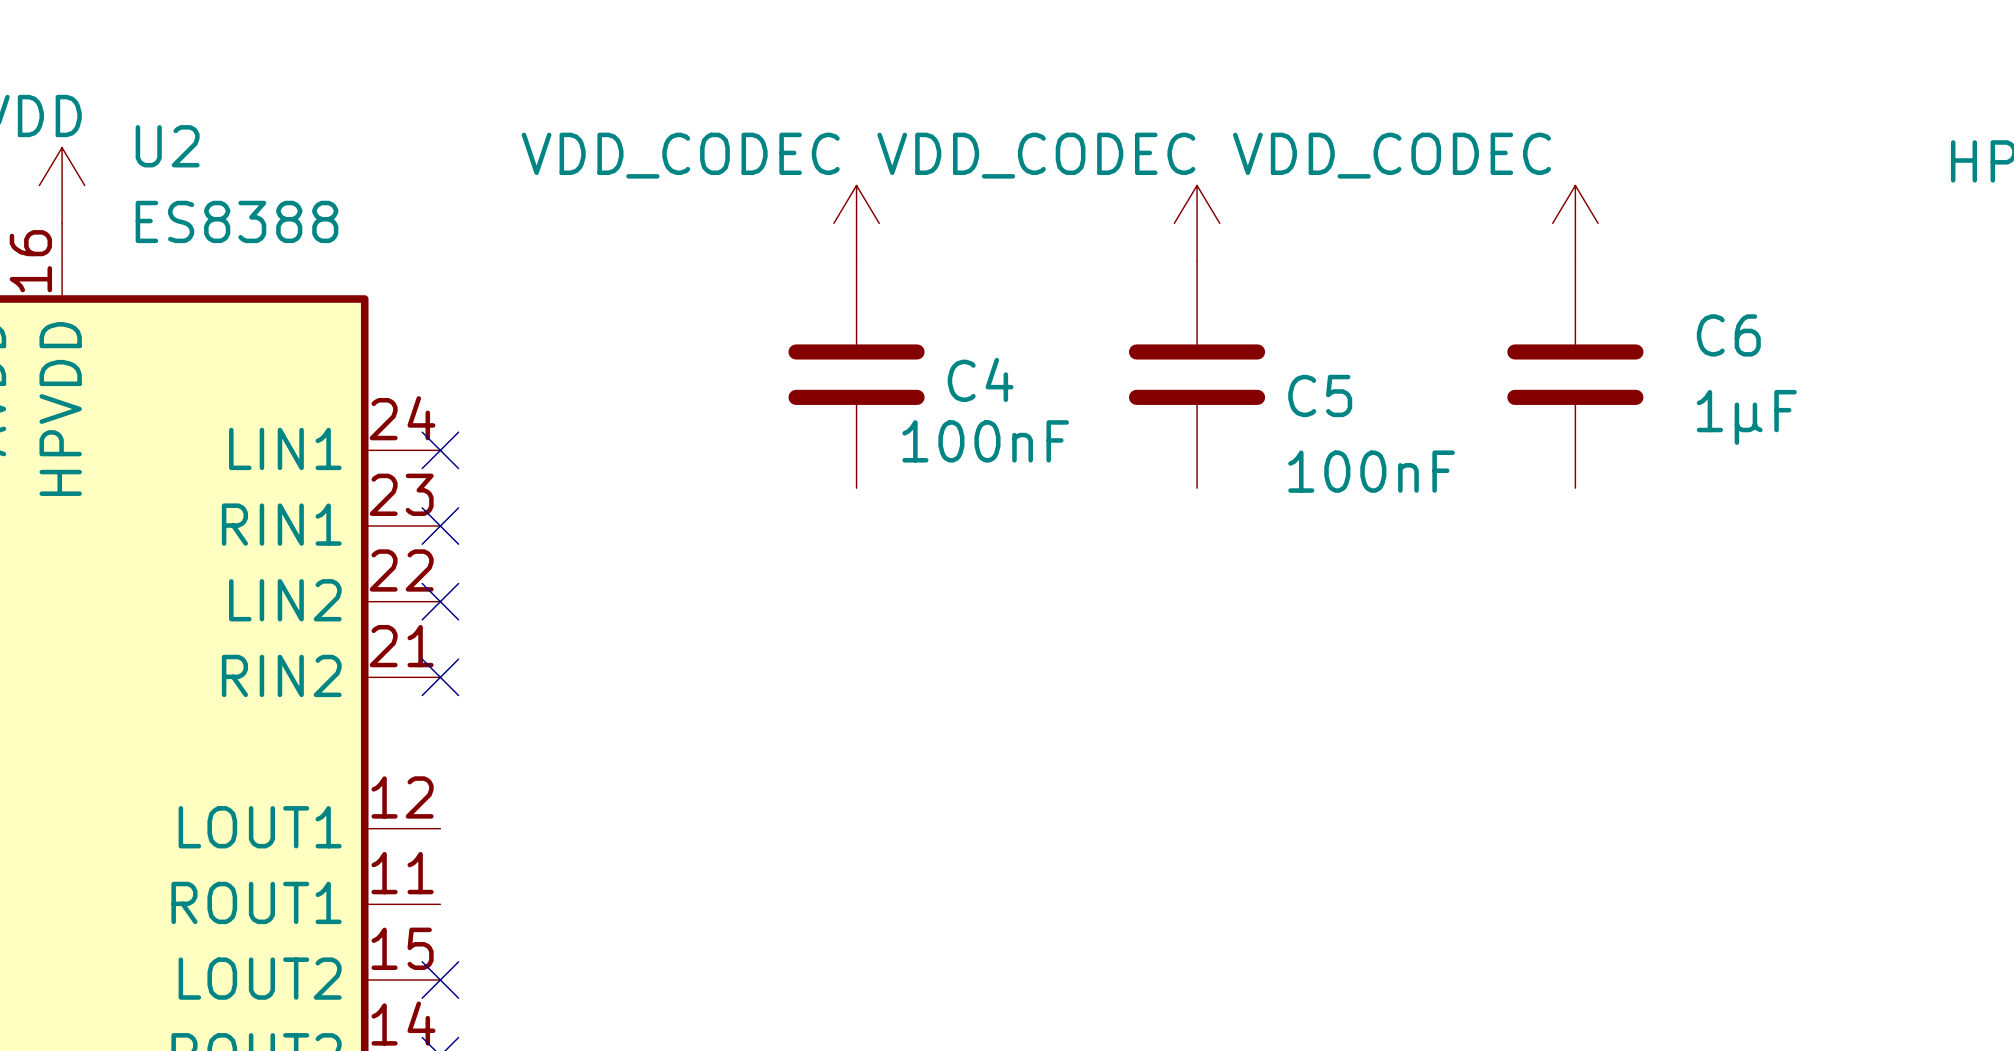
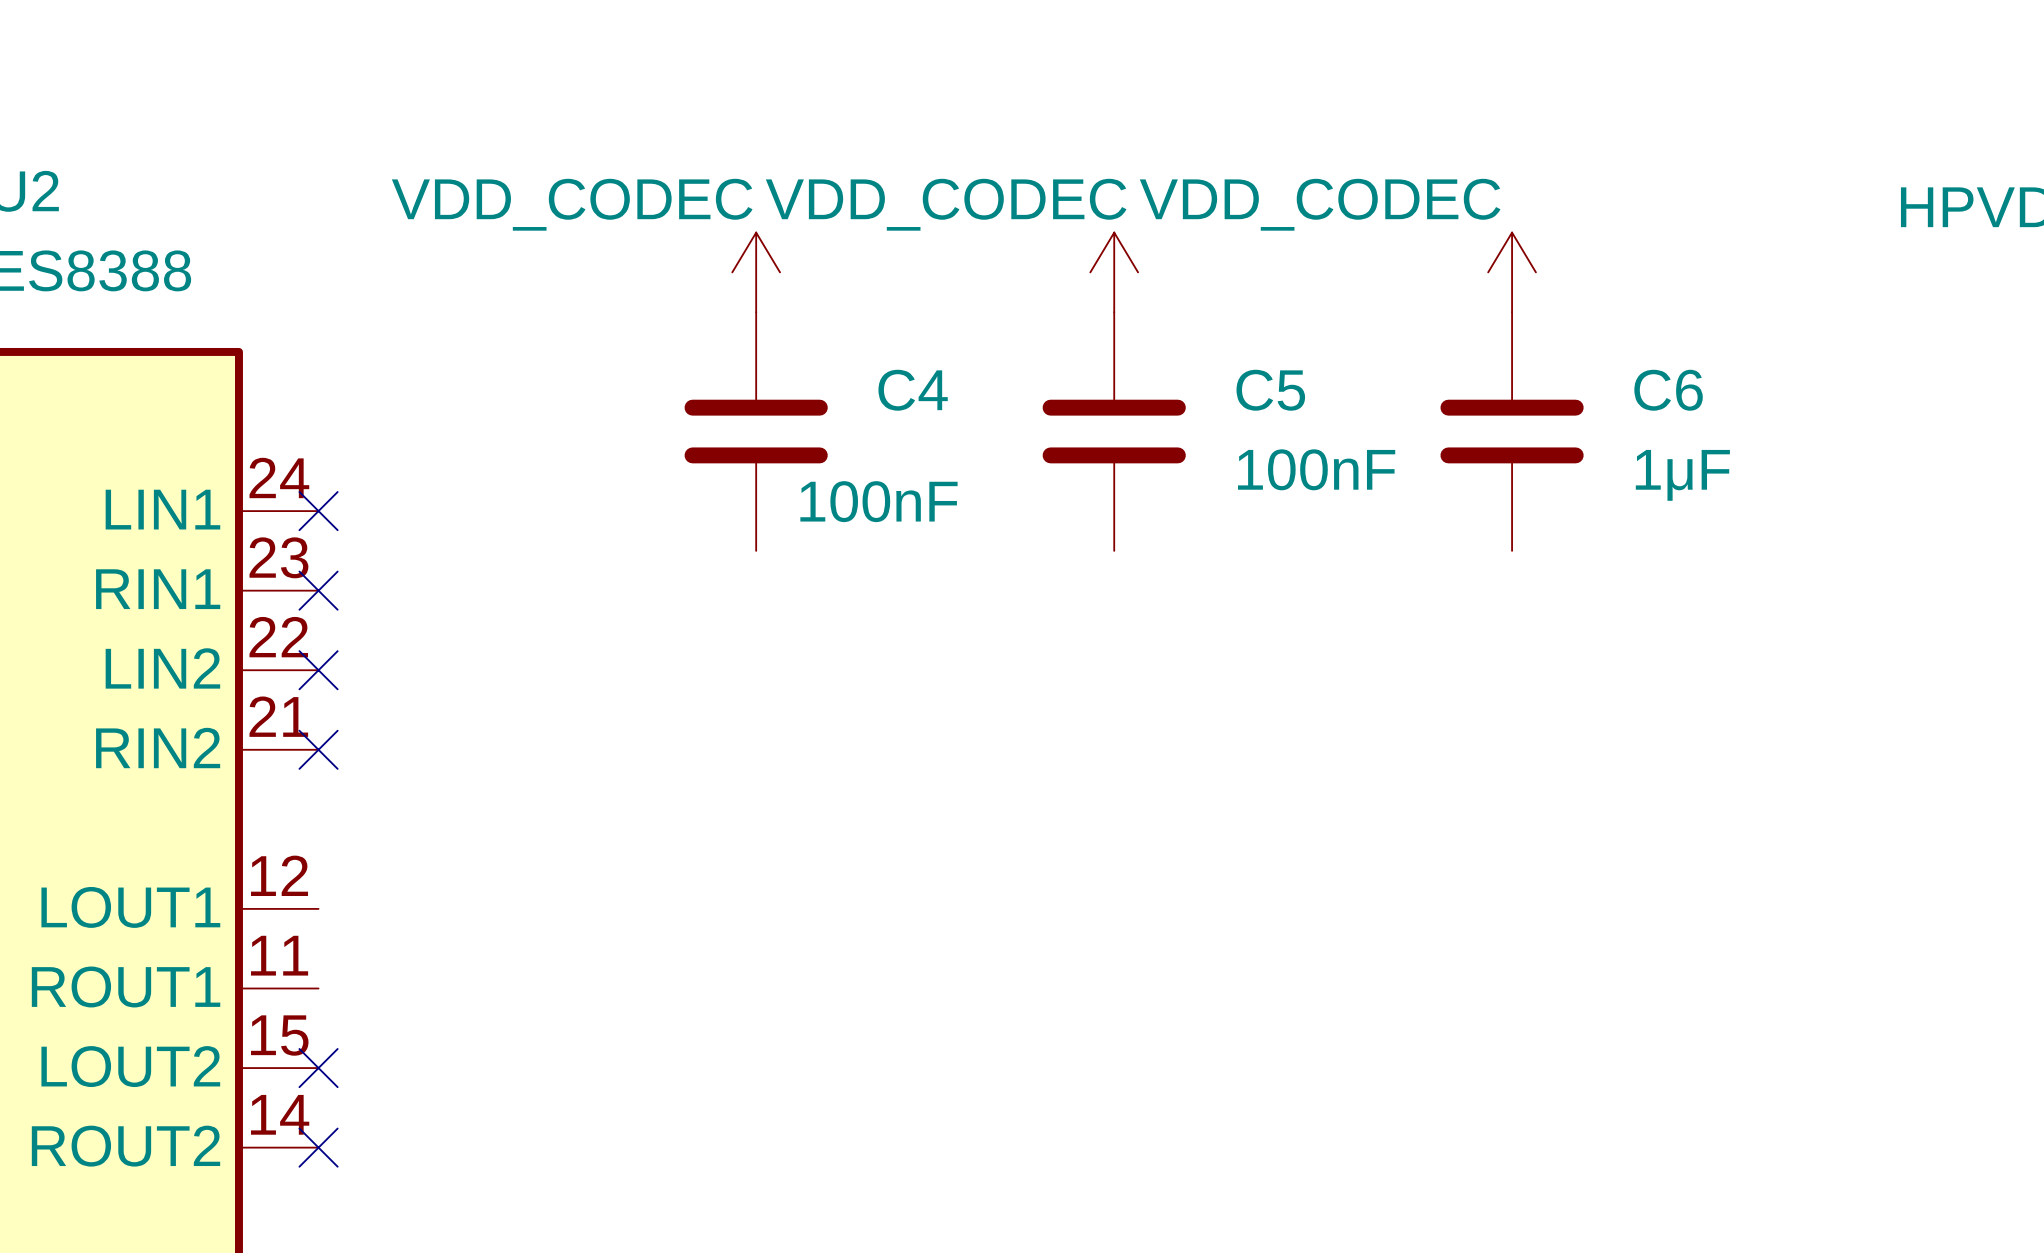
C4 name position: C4 (980, 379) -> C4 (913, 390)
C5 name position: C5 (1320, 395) -> C5 (1270, 390)
C5 value position: 100nF (1371, 471) -> 100nF (1316, 469)

